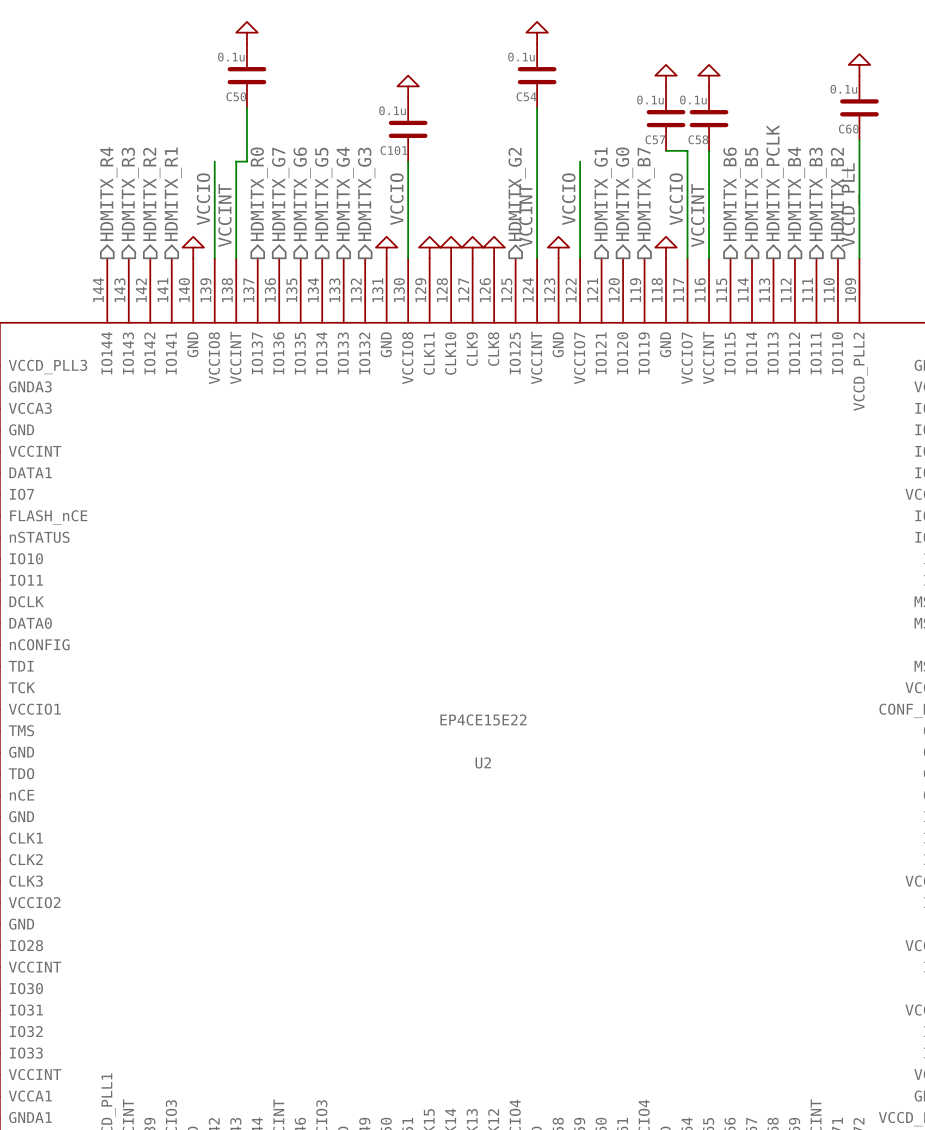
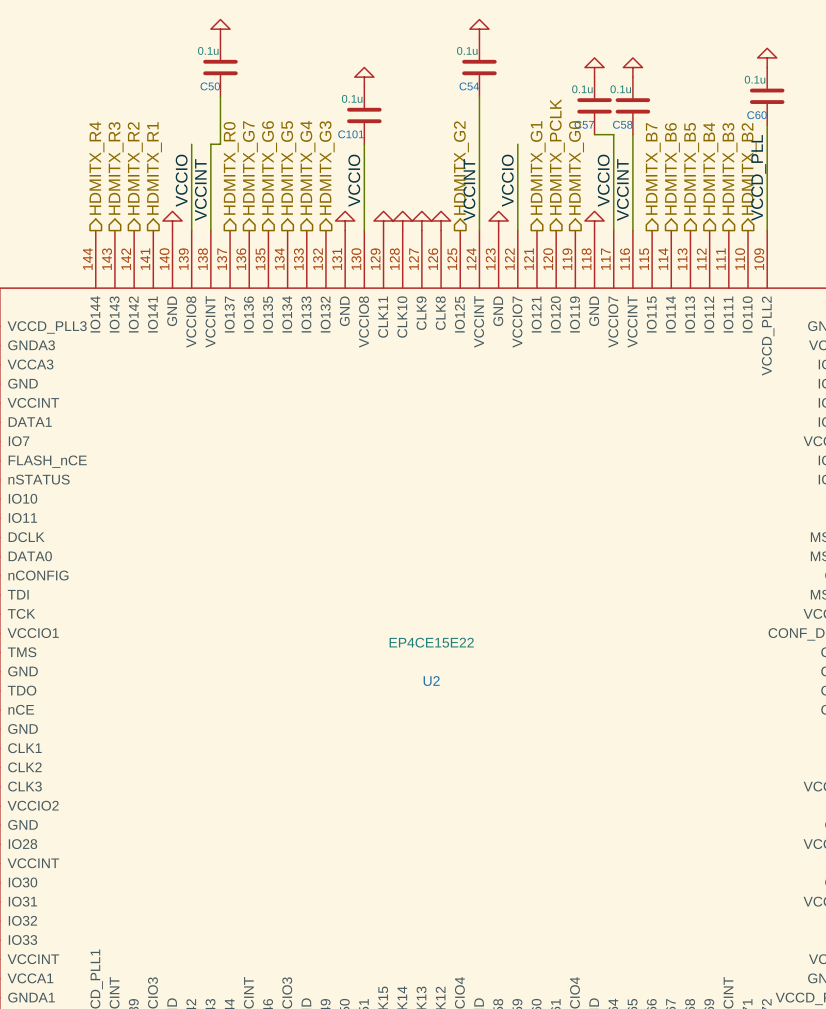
hierarchical label: HDMITX_PCLK (774, 183) -> HDMITX_B5 (691, 168)
hierarchical label: HDMITX_G0 (624, 194) -> HDMITX_PCLK (557, 157)
hierarchical label: HDMITX_B7 (646, 194) -> HDMITX_G0 (576, 167)
hierarchical label: HDMITX_B6 (731, 194) -> HDMITX_B7 (653, 168)
hierarchical label: HDMITX_B5 (753, 194) -> HDMITX_B6 (672, 168)

